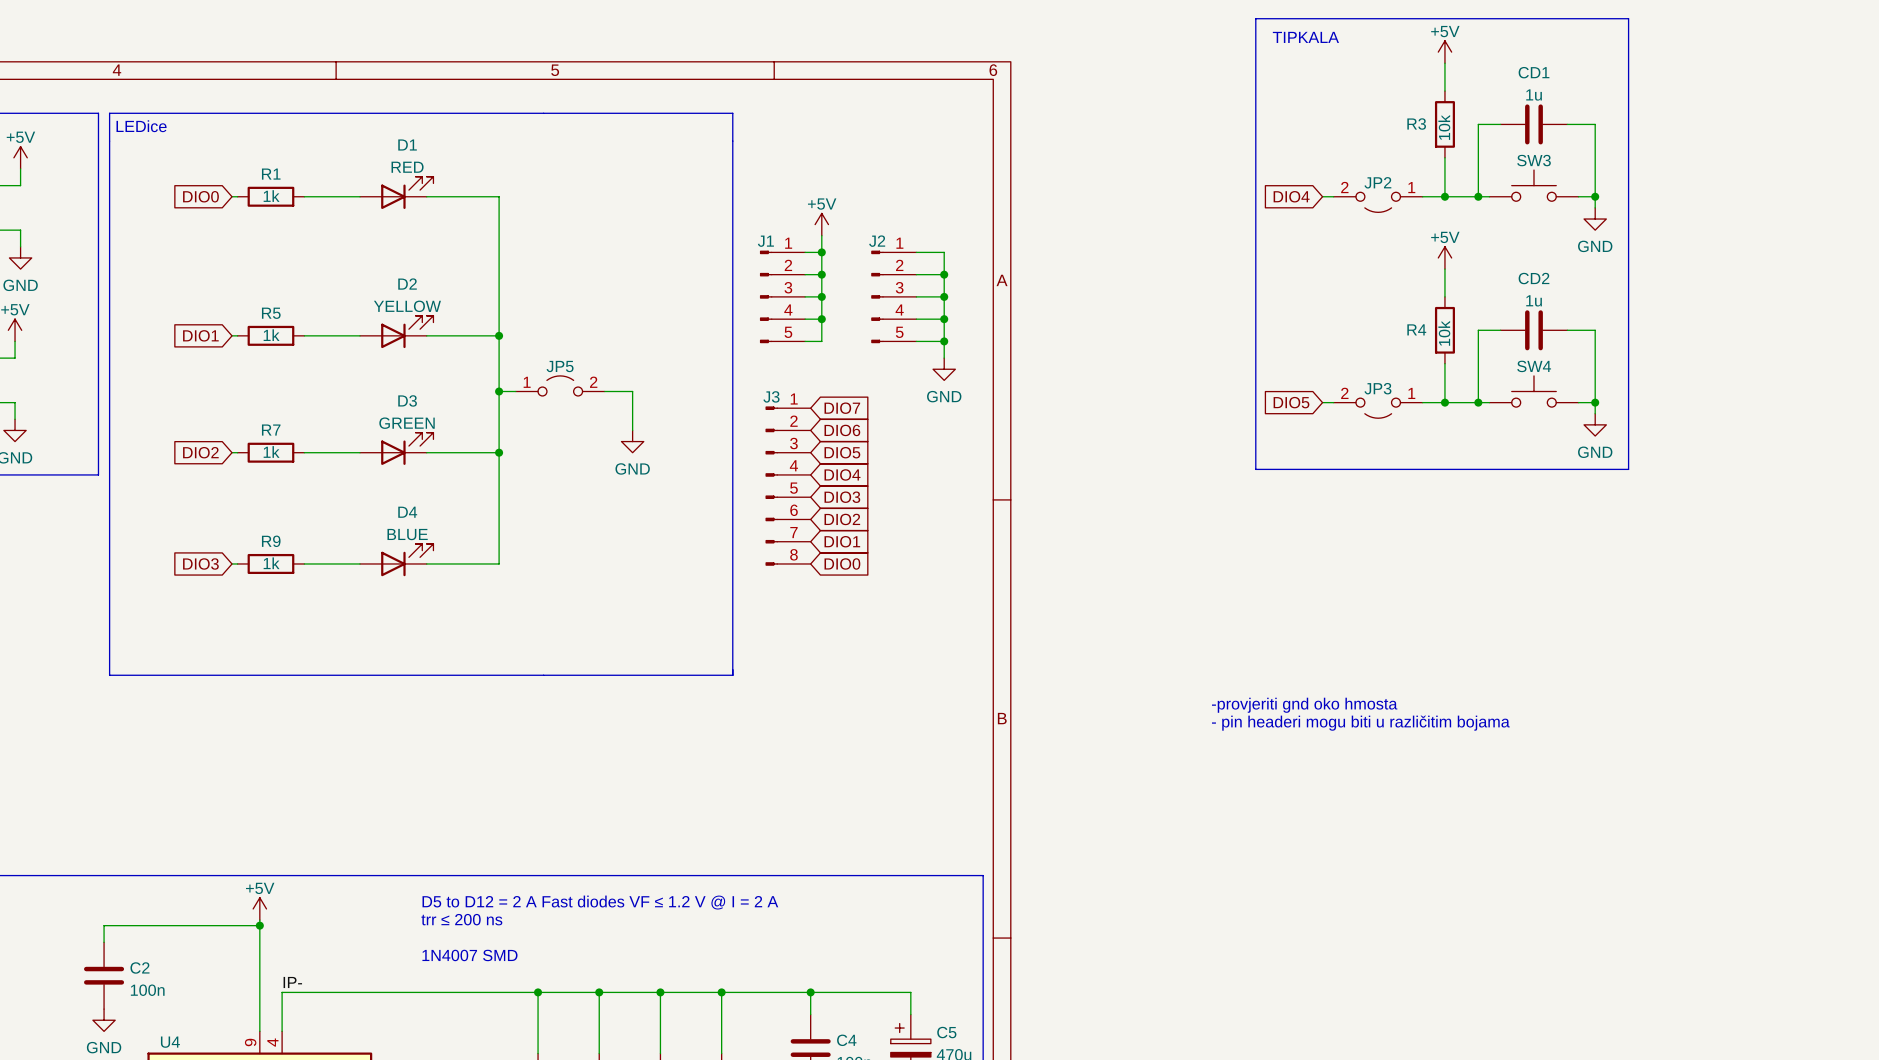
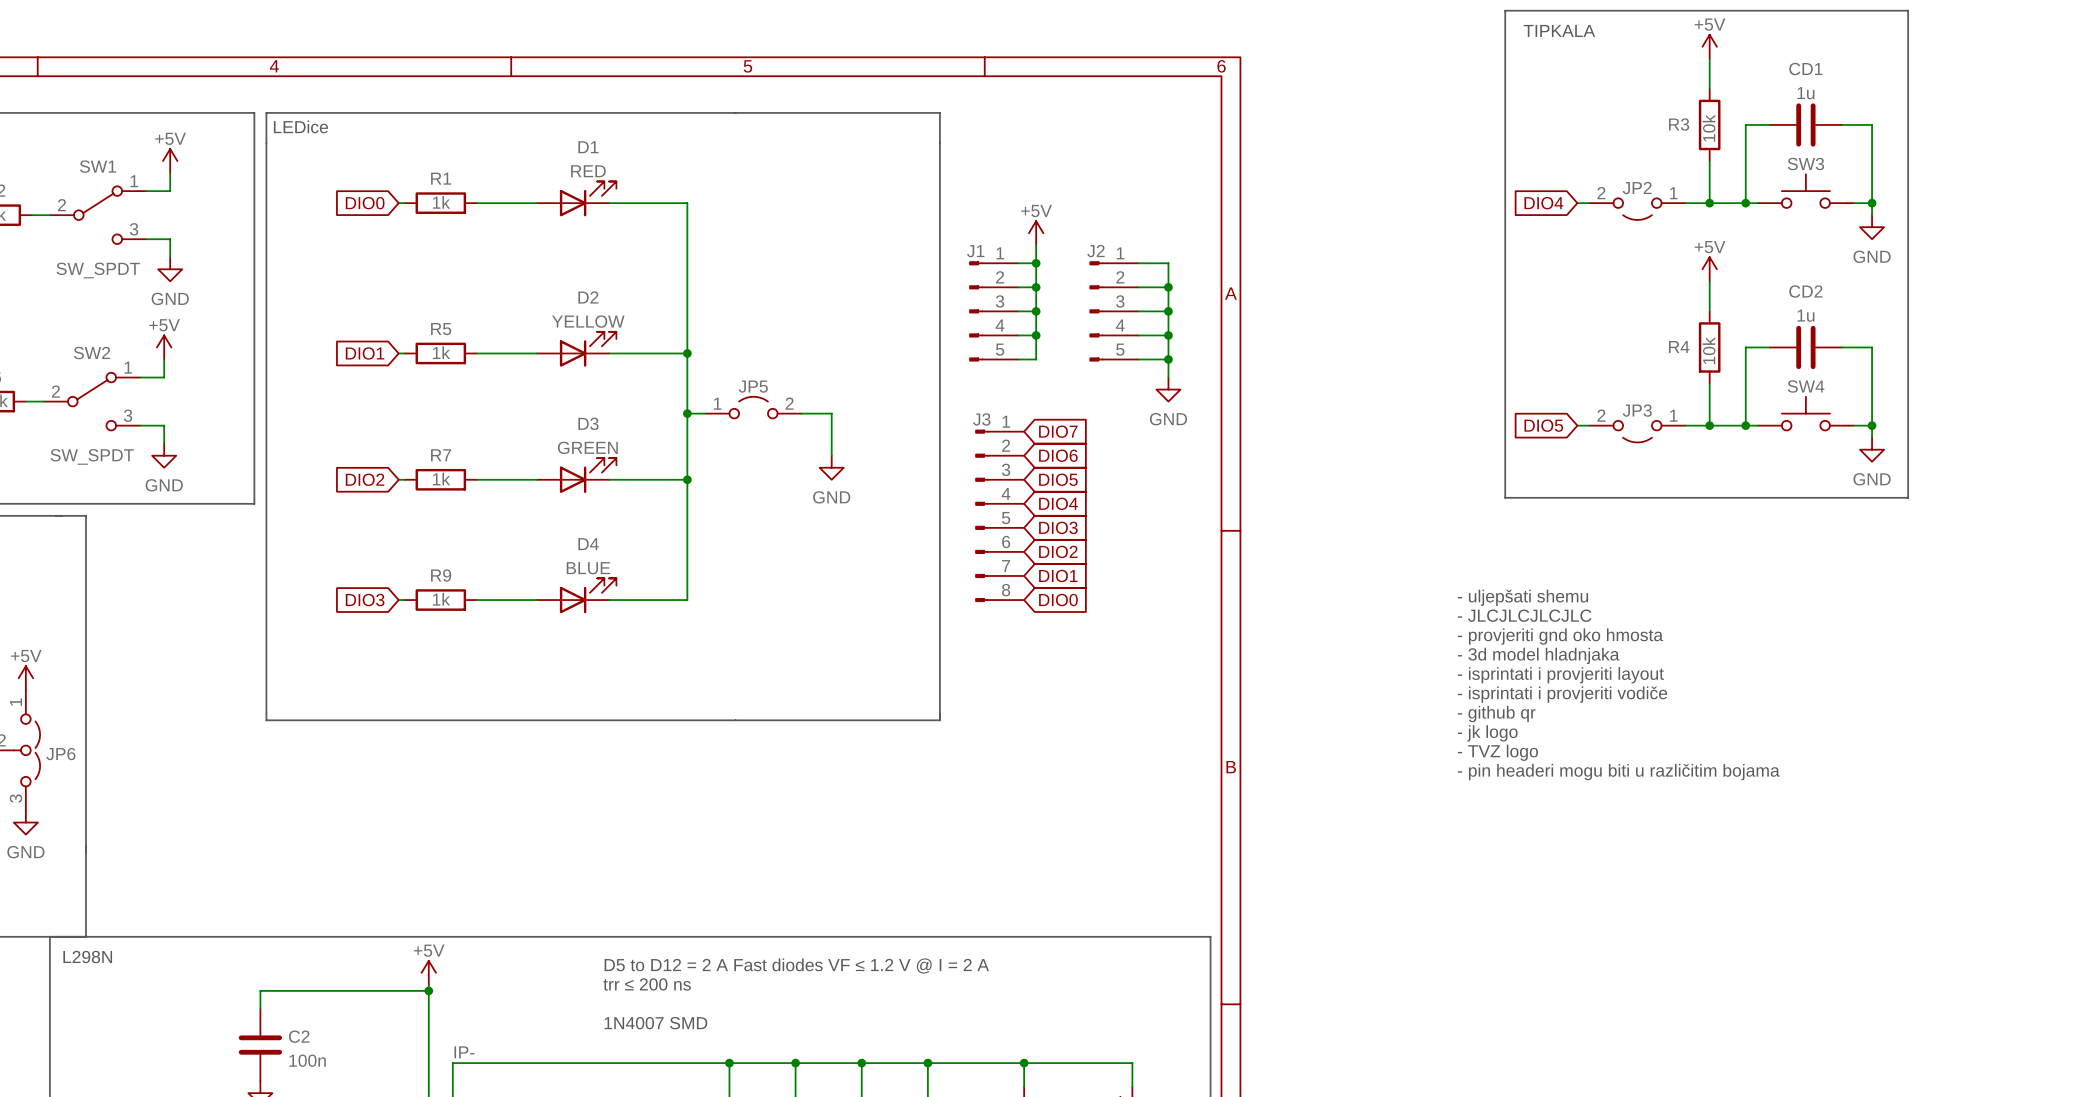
text: none -> - uljepšati shemu (1522, 597)
text: none -> - JLCJLCJLCJLC (1524, 615)
text: none -> - provjeriti gnd oko hmosta (1560, 636)
text: none -> - 3d model hladnjaka (1538, 655)
text: none -> - isprintati i provjeriti layout (1560, 675)
text: none -> - isprintati i provjeriti vodiče (1562, 694)
text: none -> - github qr (1496, 714)
text: none -> - jk logo (1487, 733)
text: -provjeriti gnd oko hmosta (1304, 705) -> - TVZ logo (1497, 752)

